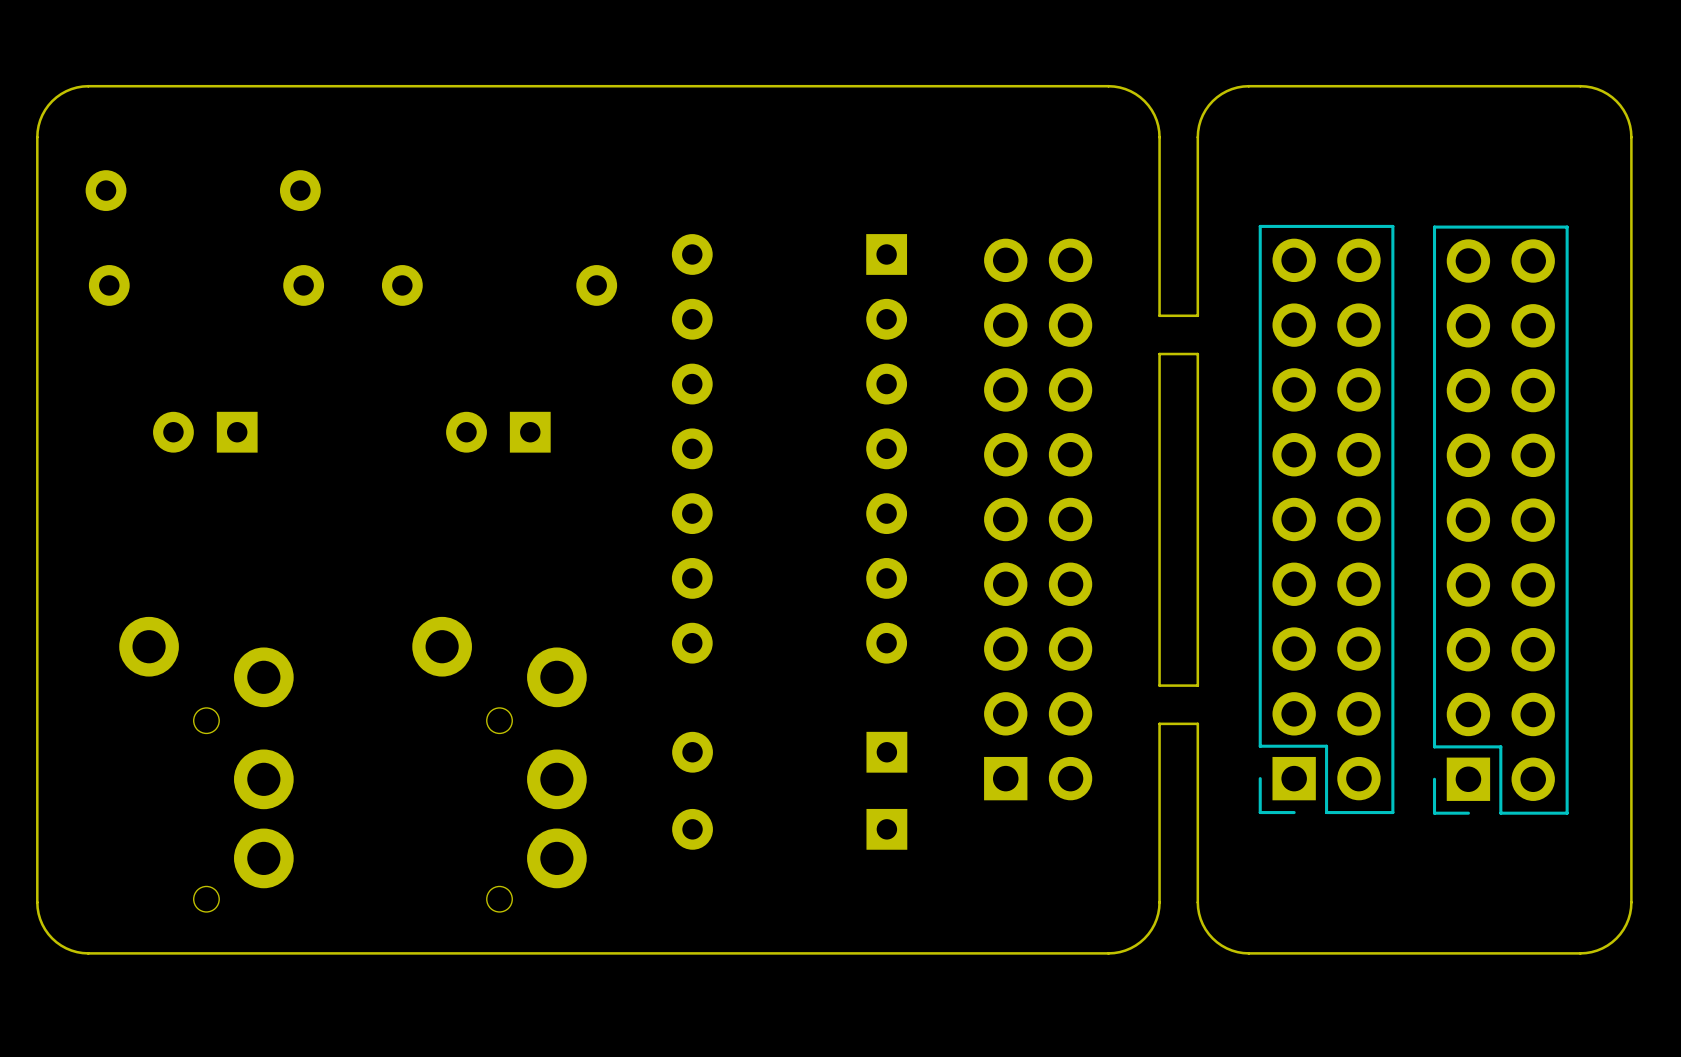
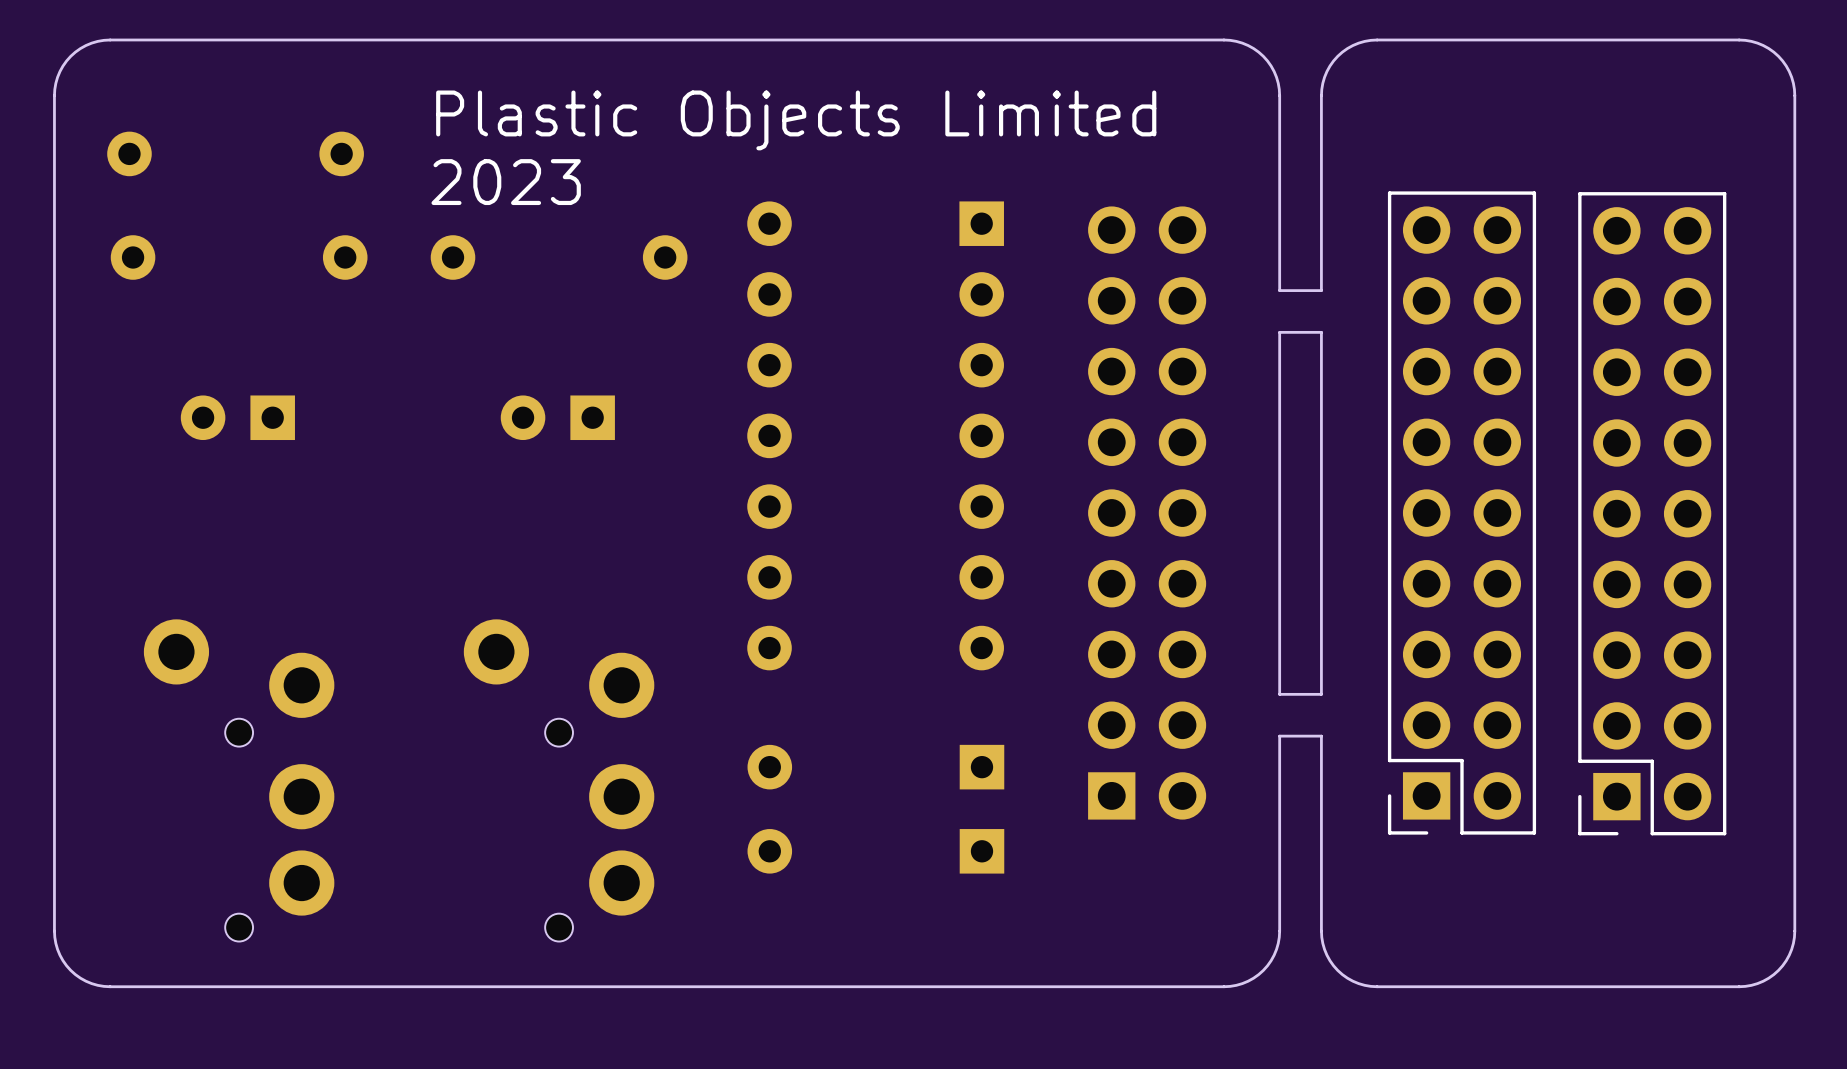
text: none -> Plastic Objects Limited (796, 120)
text: none -> 2023 (506, 182)

